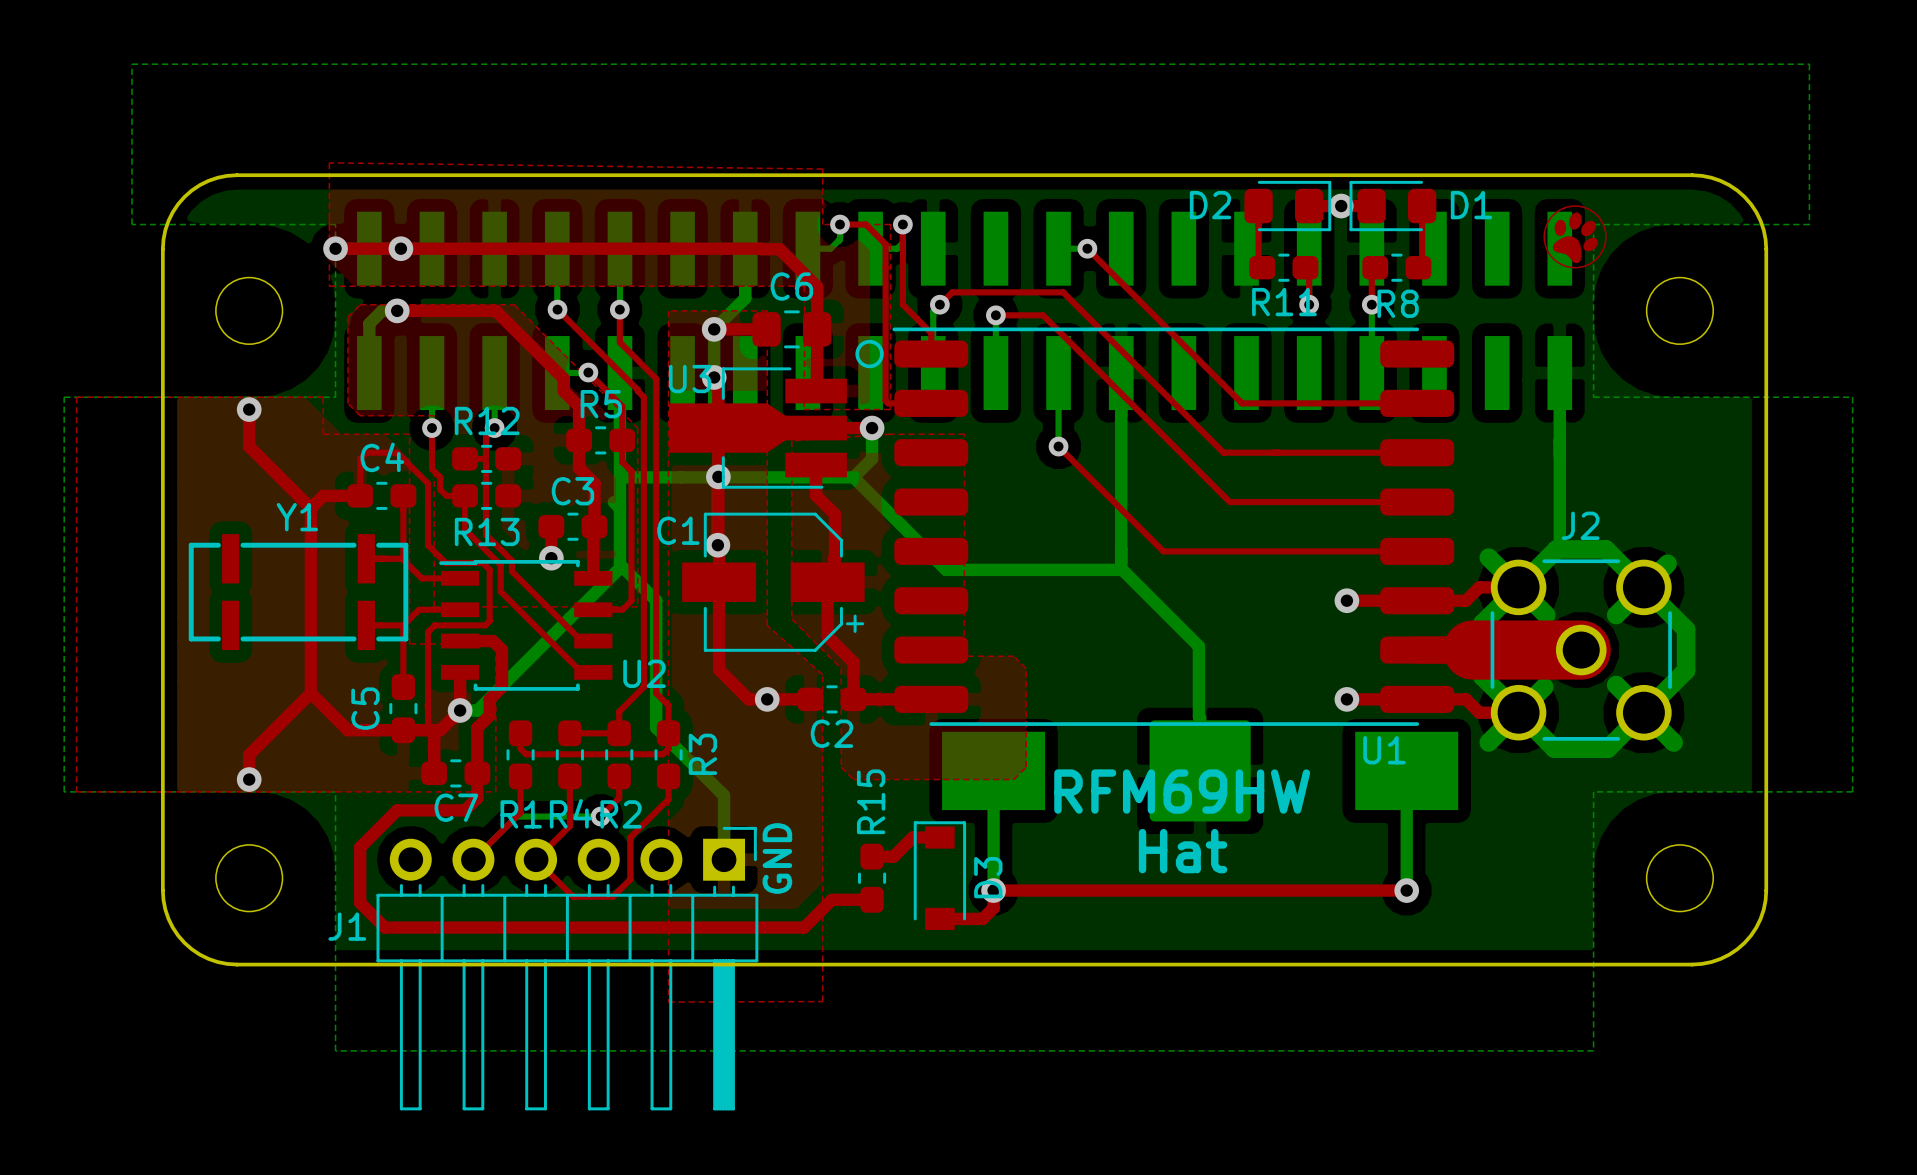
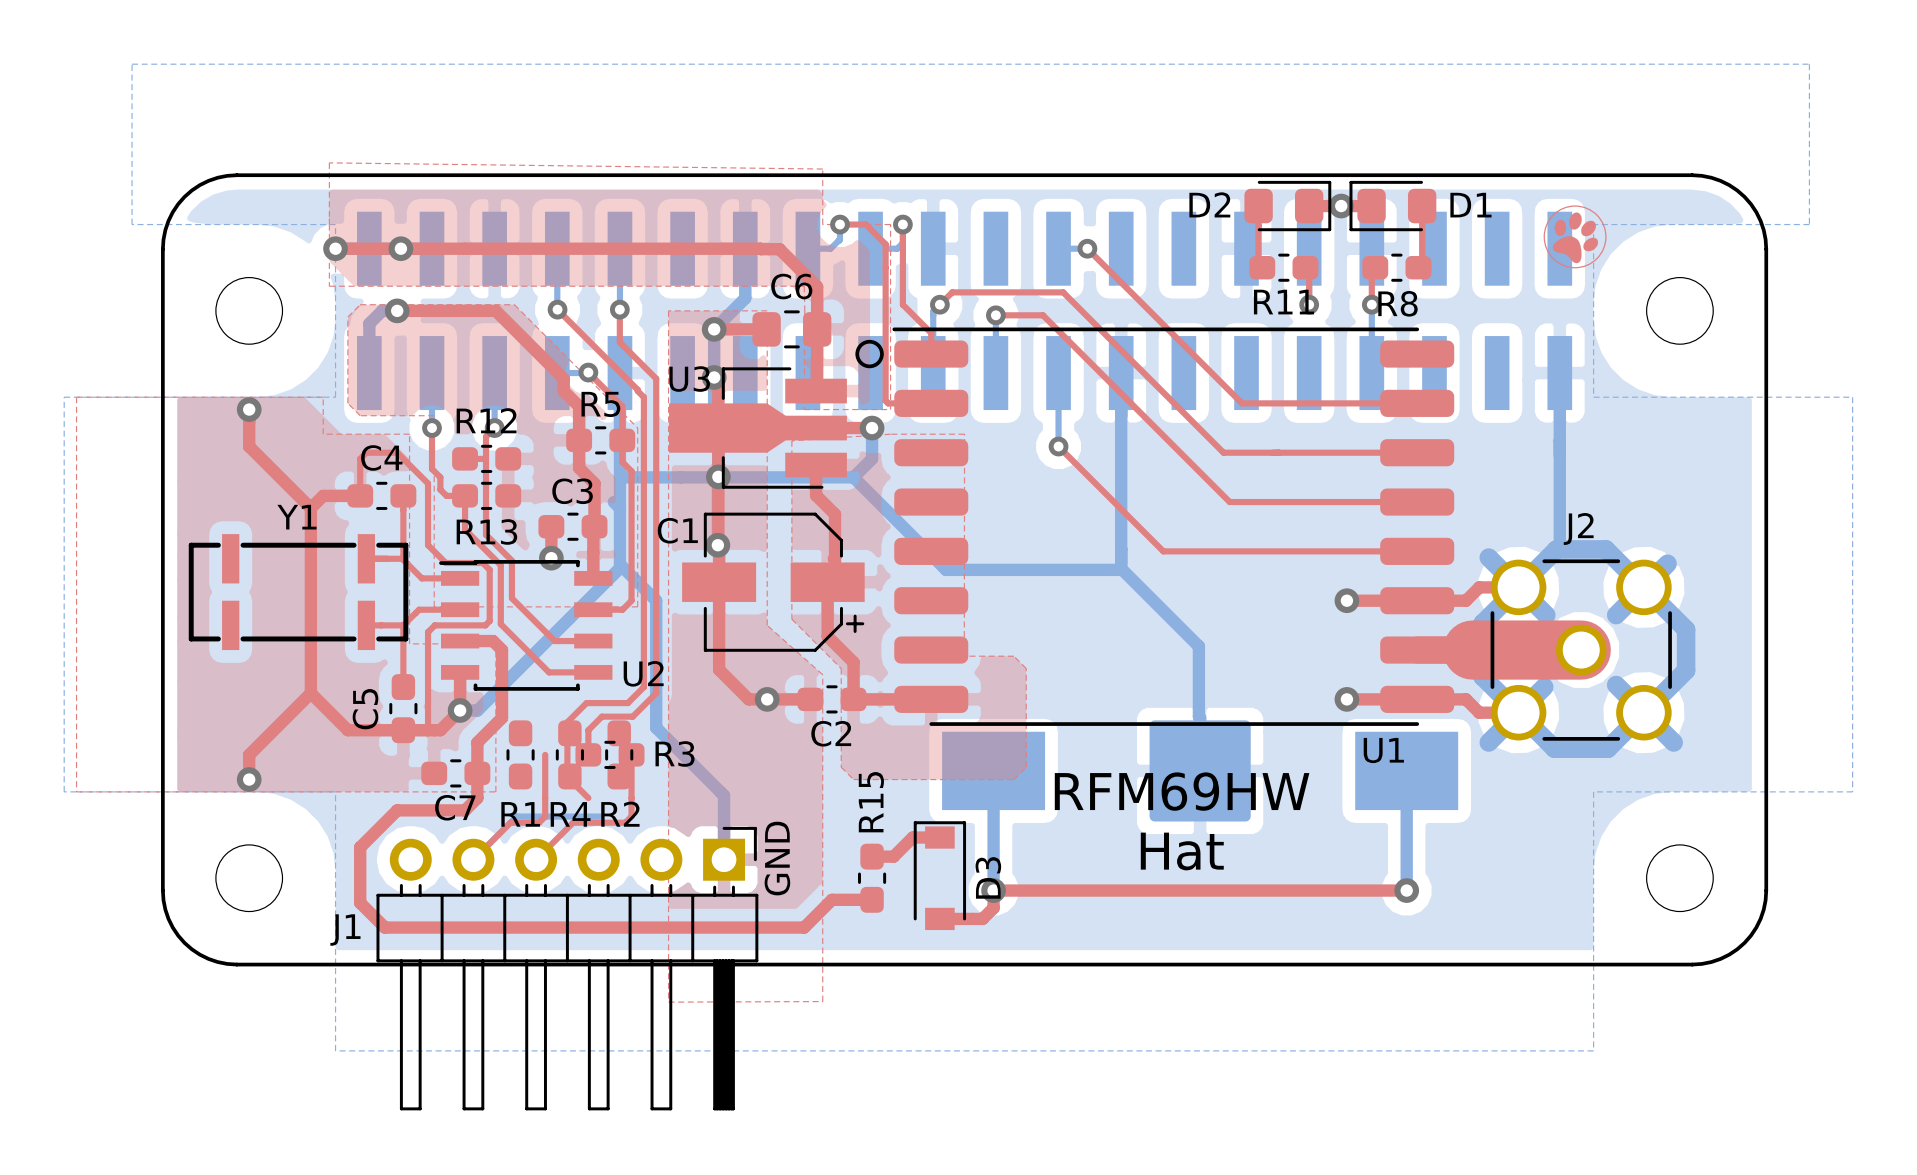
top track: (511, 571) (581, 641) -> (511, 571) (511, 598) (554, 641) (581, 641)
top track: (500, 591) (581, 672) -> (500, 591) (500, 624) (549, 672) (581, 672)
top track: (502, 687) (489, 699) (489, 715) (477, 727) (477, 742) -> (502, 687) (502, 717) (477, 742)
top track: (656, 693) (668, 705) (668, 748) (663, 754) (526, 754) (520, 748) (520, 733) -> (656, 693) (632, 716) (601, 716) (588, 730) (588, 754)
top track: (627, 703) (619, 711) (619, 733) (569, 733) -> (627, 703) (586, 703) (567, 722) (567, 777) (588, 798)
top track: (434, 730) (434, 773) -> none
R3 rotation: 0° (668, 754) -> 90° clockwise (609, 754)
R3 position: (668, 754) -> (609, 754)
top track: (520, 776) (520, 812) (510, 822) -> (545, 754) (545, 816) (539, 822) (510, 822)
top track: (569, 776) (569, 825) -> (631, 754) (631, 816) (625, 822) (573, 822) (569, 825)
top track: (619, 776) (619, 798) (600, 816) -> none
top track: (668, 776) (668, 799) (630, 837) (630, 879) (613, 896) (573, 896) (536, 859) -> none
via: (600, 816) -> none

